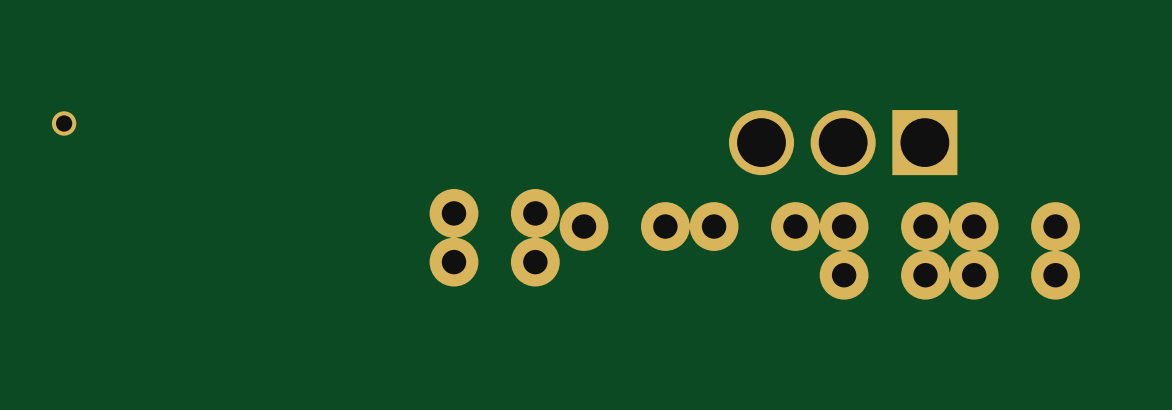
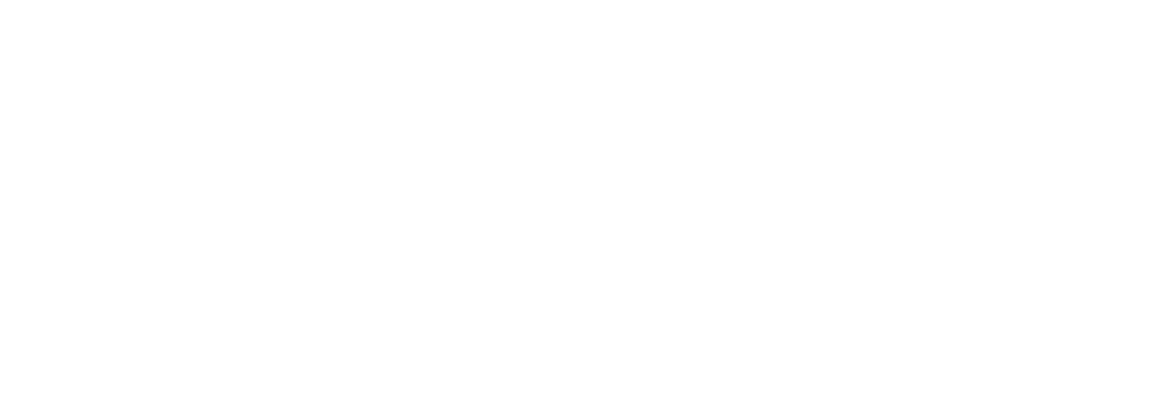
part: (64, 123) -> none
part: (843, 142) -> none
part: (494, 213) -> none
part: (624, 226) -> none
part: (754, 226) -> none
part: (884, 226) -> none
part: (1014, 226) -> none
part: (494, 262) -> none
part: (884, 275) -> none
part: (1014, 275) -> none

